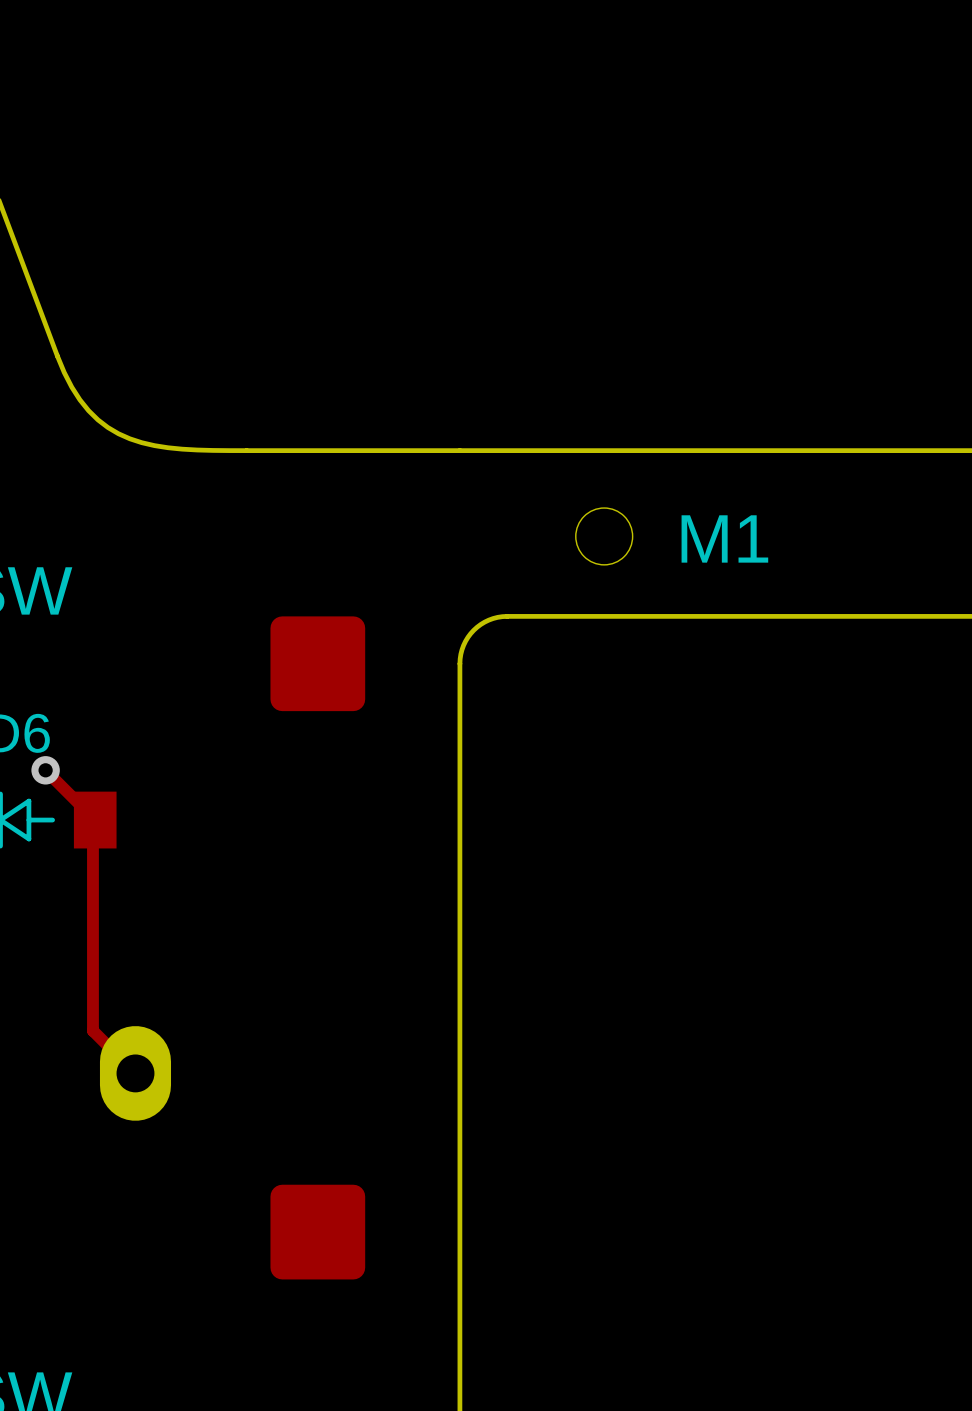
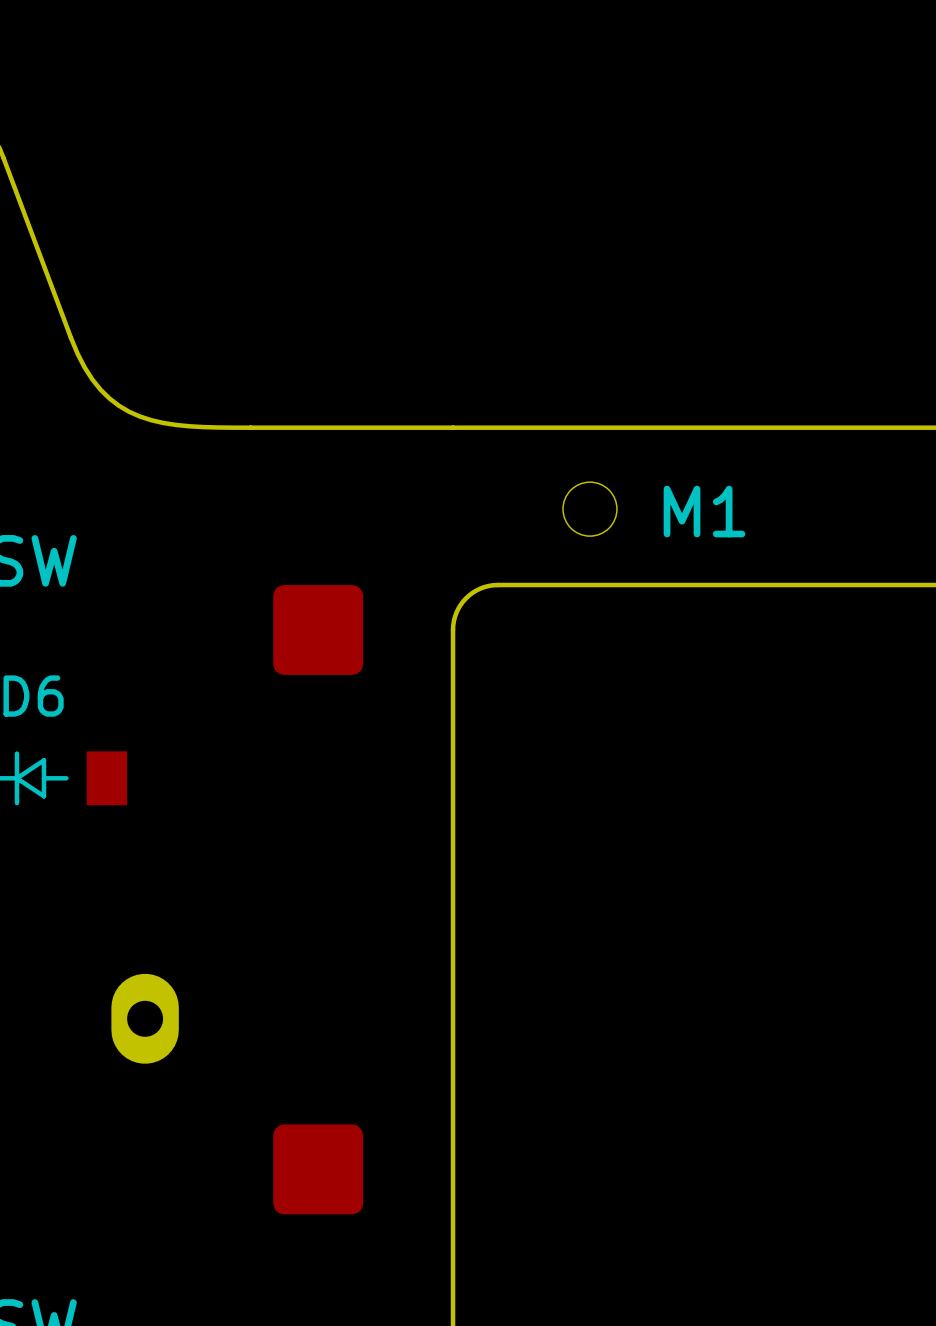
track: (45, 770) (95, 820) (92, 841) (92, 1030) (135, 1073) -> none
via: (45, 770) -> none

